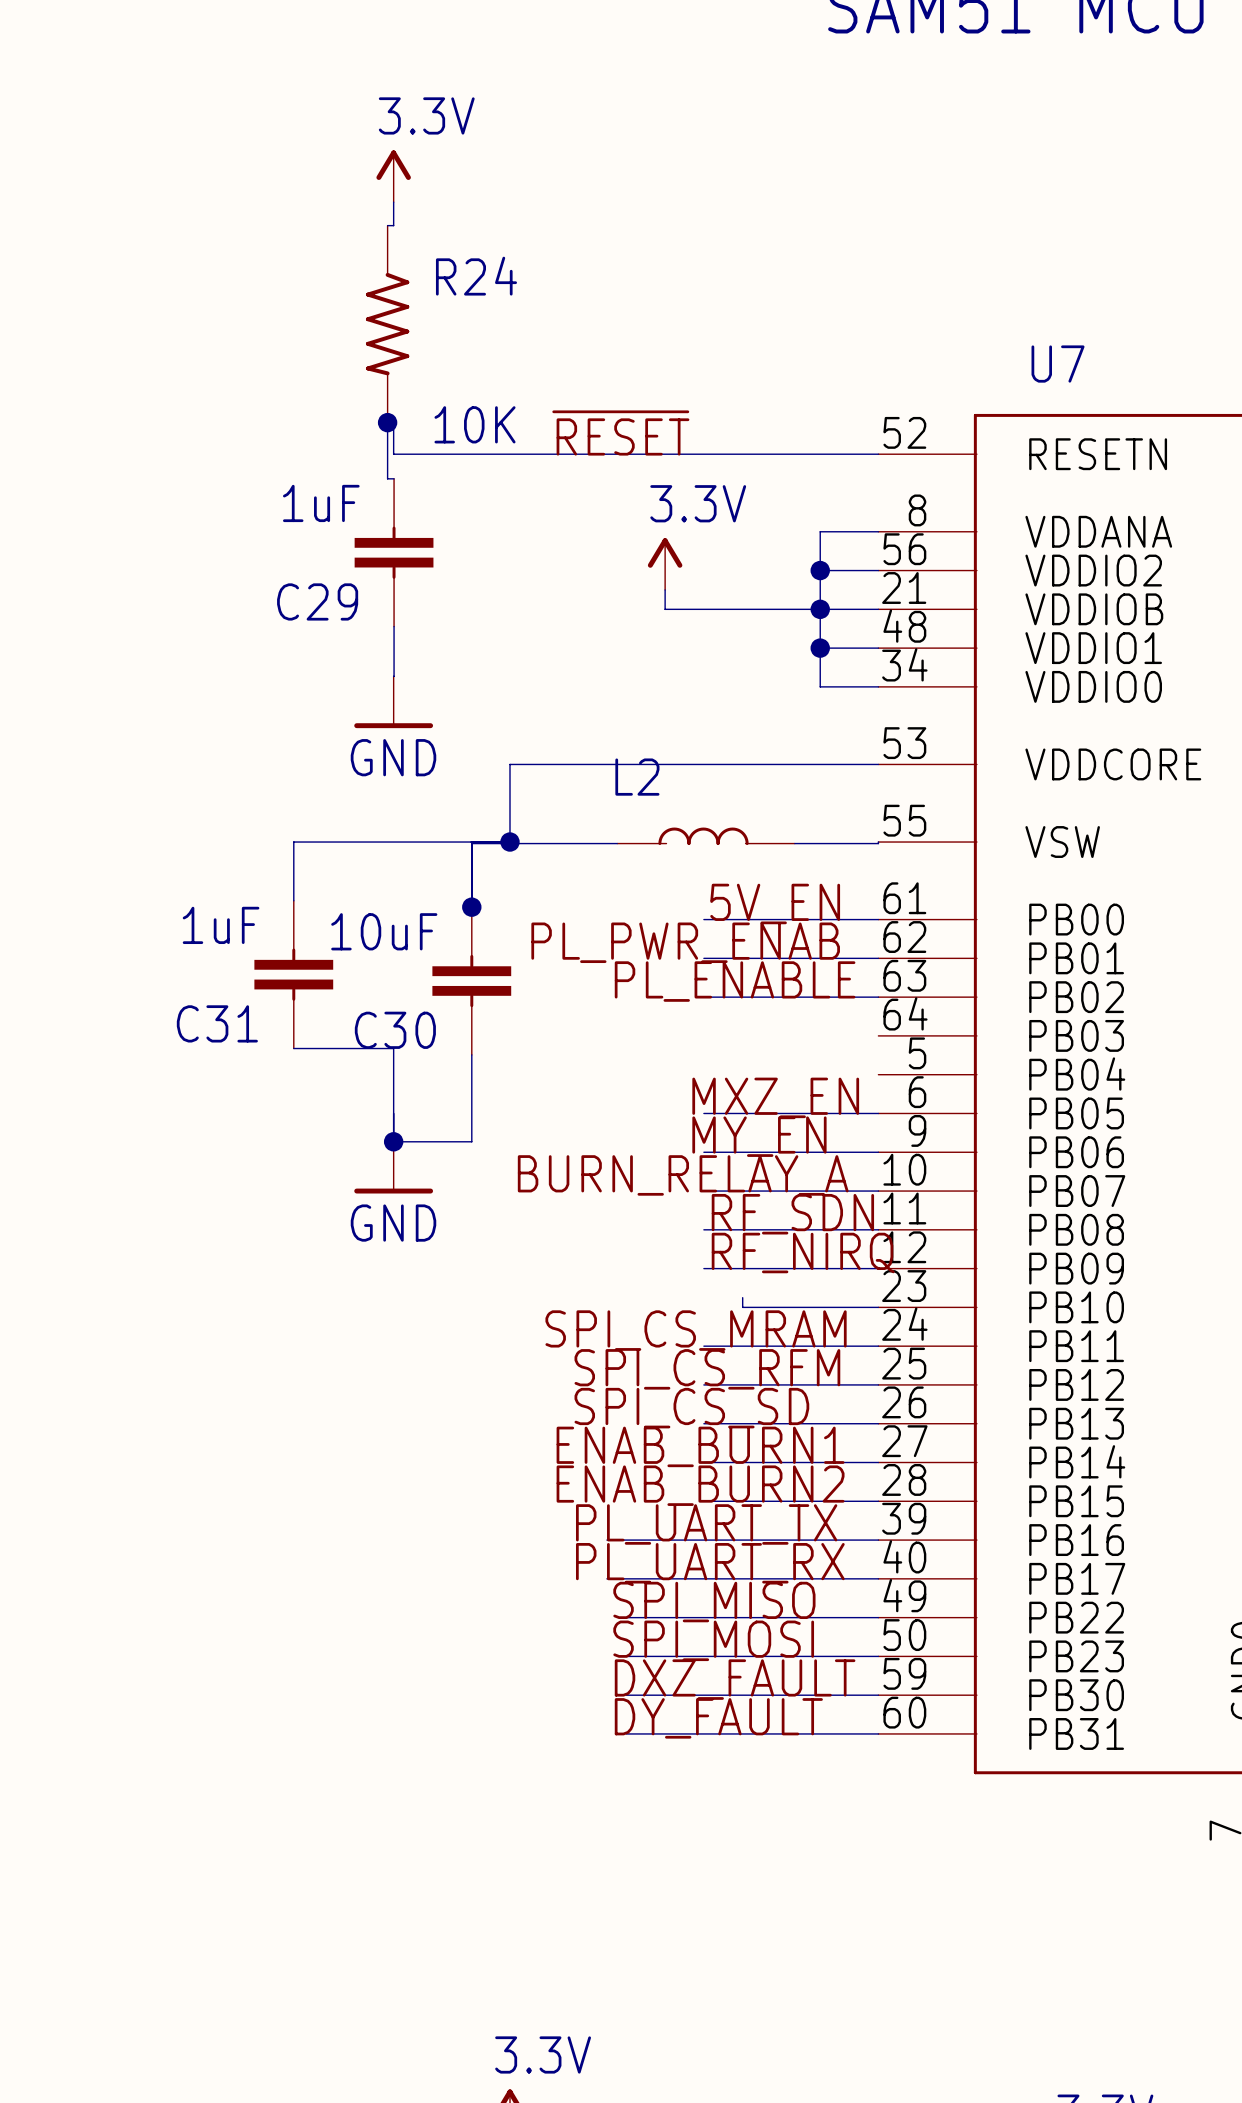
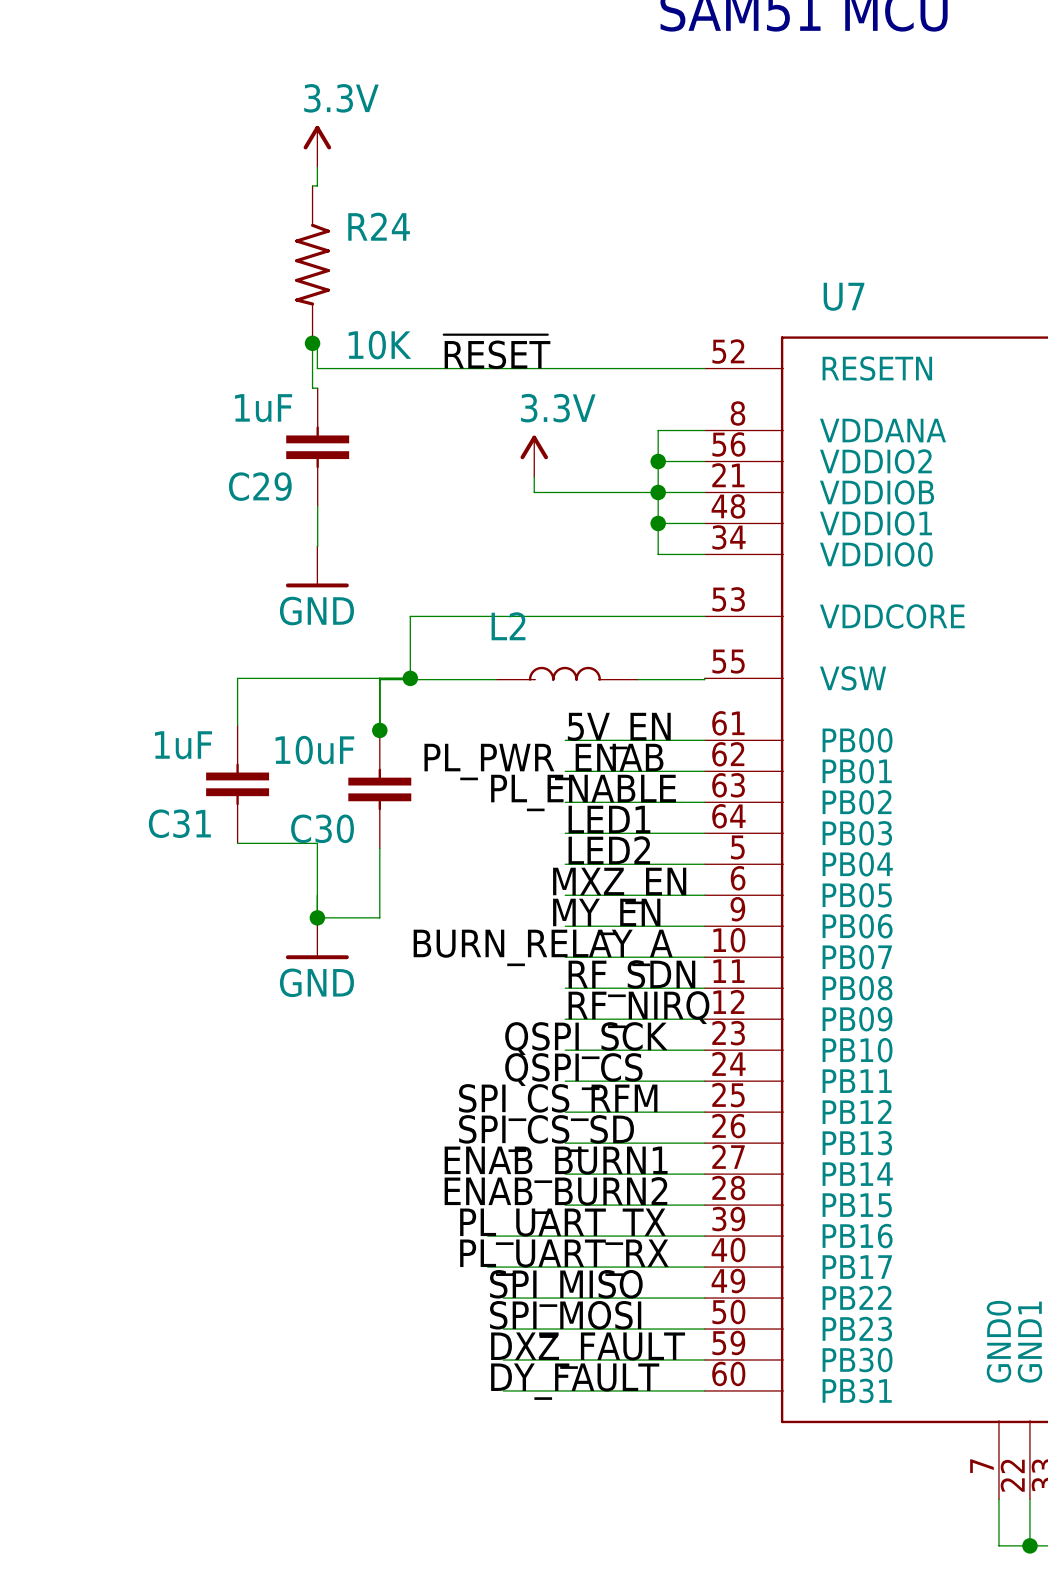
label: none -> LED1 (609, 819)
wire: none -> (565, 833) (704, 833)
label: none -> LED2 (609, 850)
wire: none -> (565, 864) (704, 864)
label: none -> QSPI_SCK (586, 1040)
wire: (742, 1297) (742, 1307) -> (565, 1050) (596, 1050)
label: SPI_CS_MRAM (696, 1330) -> QSPI_CS (573, 1071)

